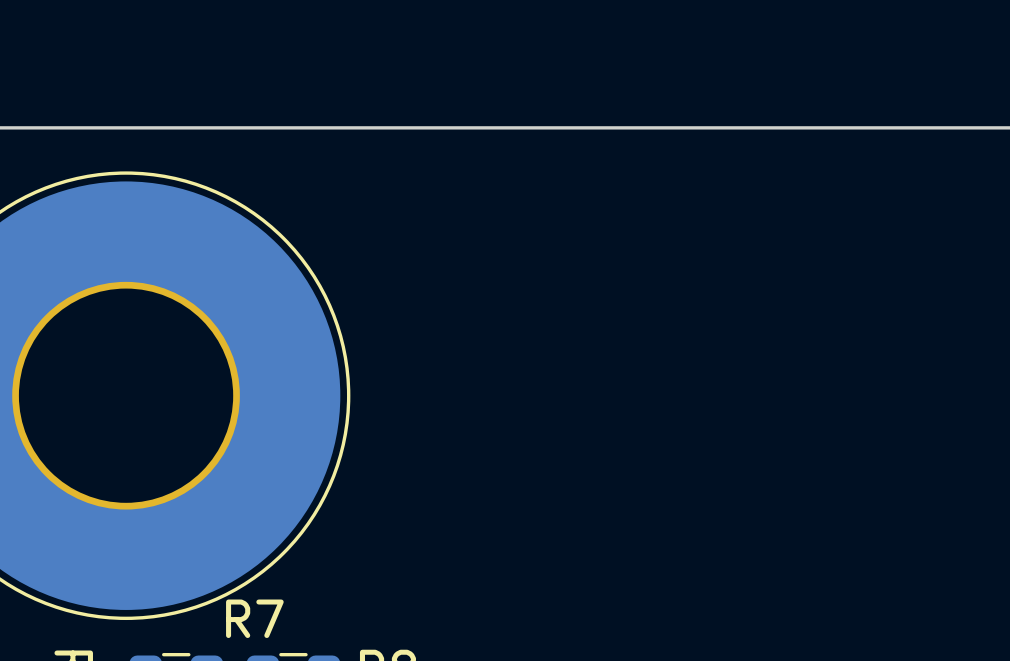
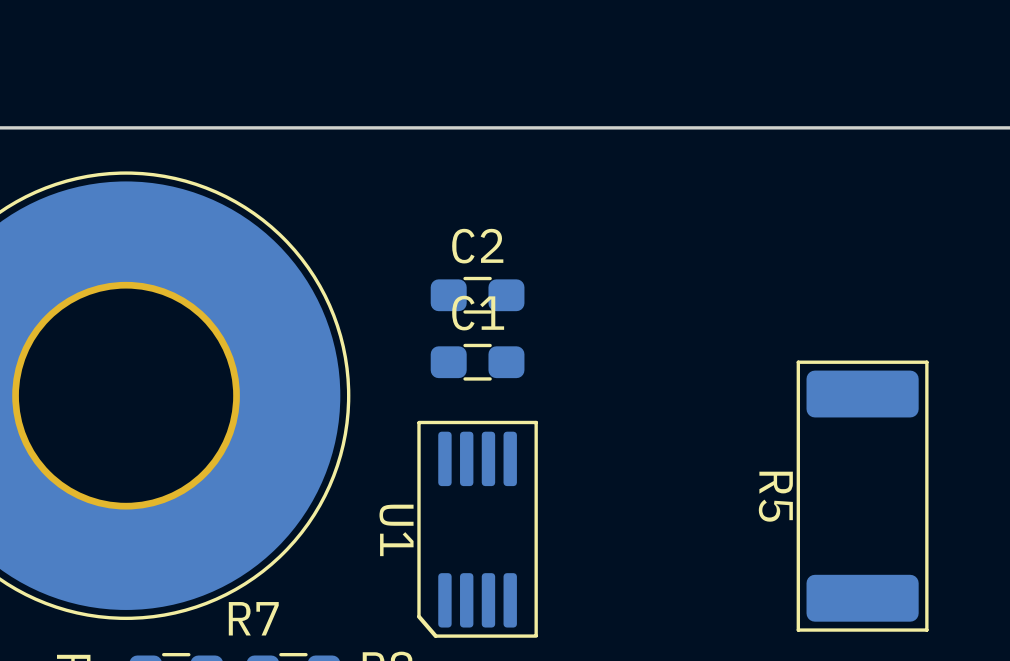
C2: none -> (477, 295)
C1: none -> (477, 362)
R5: none -> (862, 496)
U1: none -> (477, 529)

